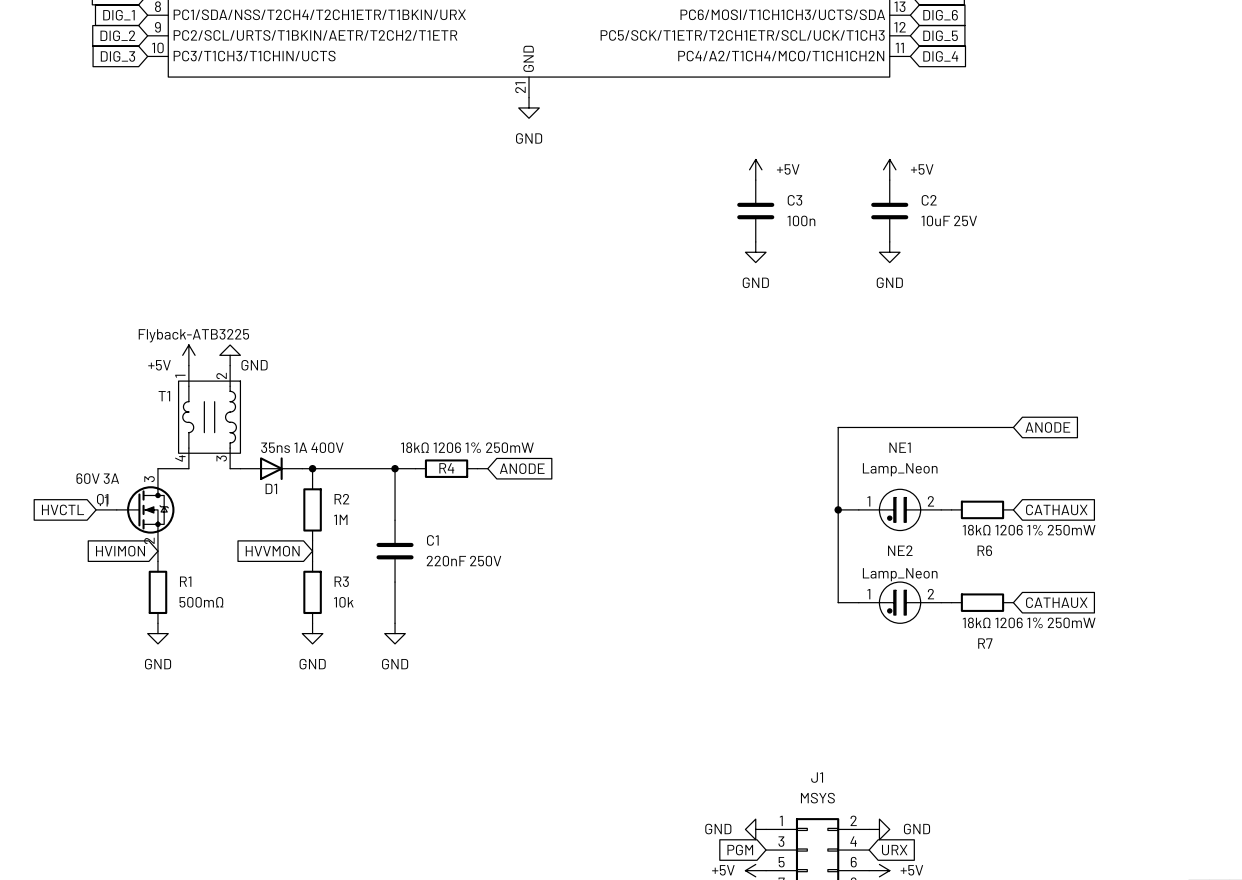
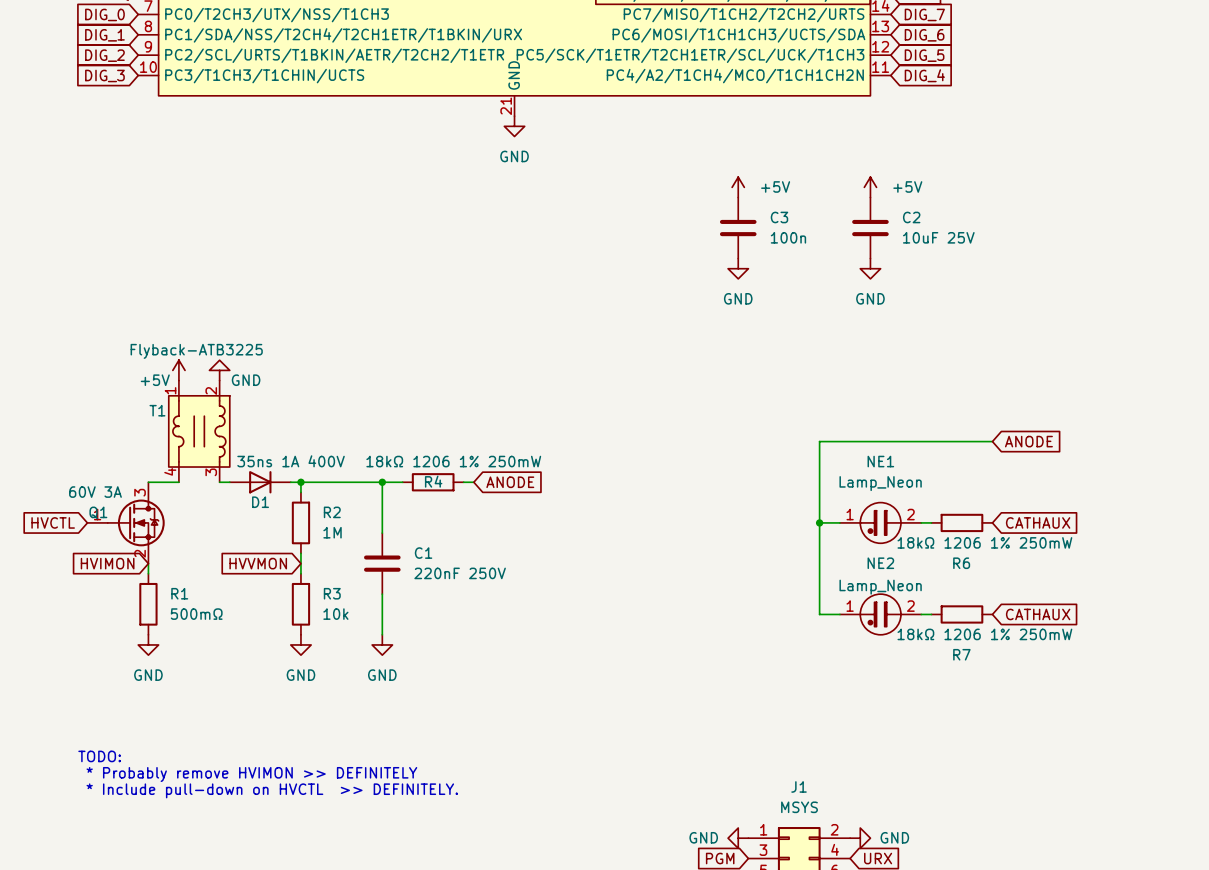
text: none -> TODO: (99, 756)
text: none -> * Probably remove HVIMON >> DEFINITELY (251, 774)
text: none -> * Include pull-down on HVCTL >> DEFINITELY. (272, 790)

